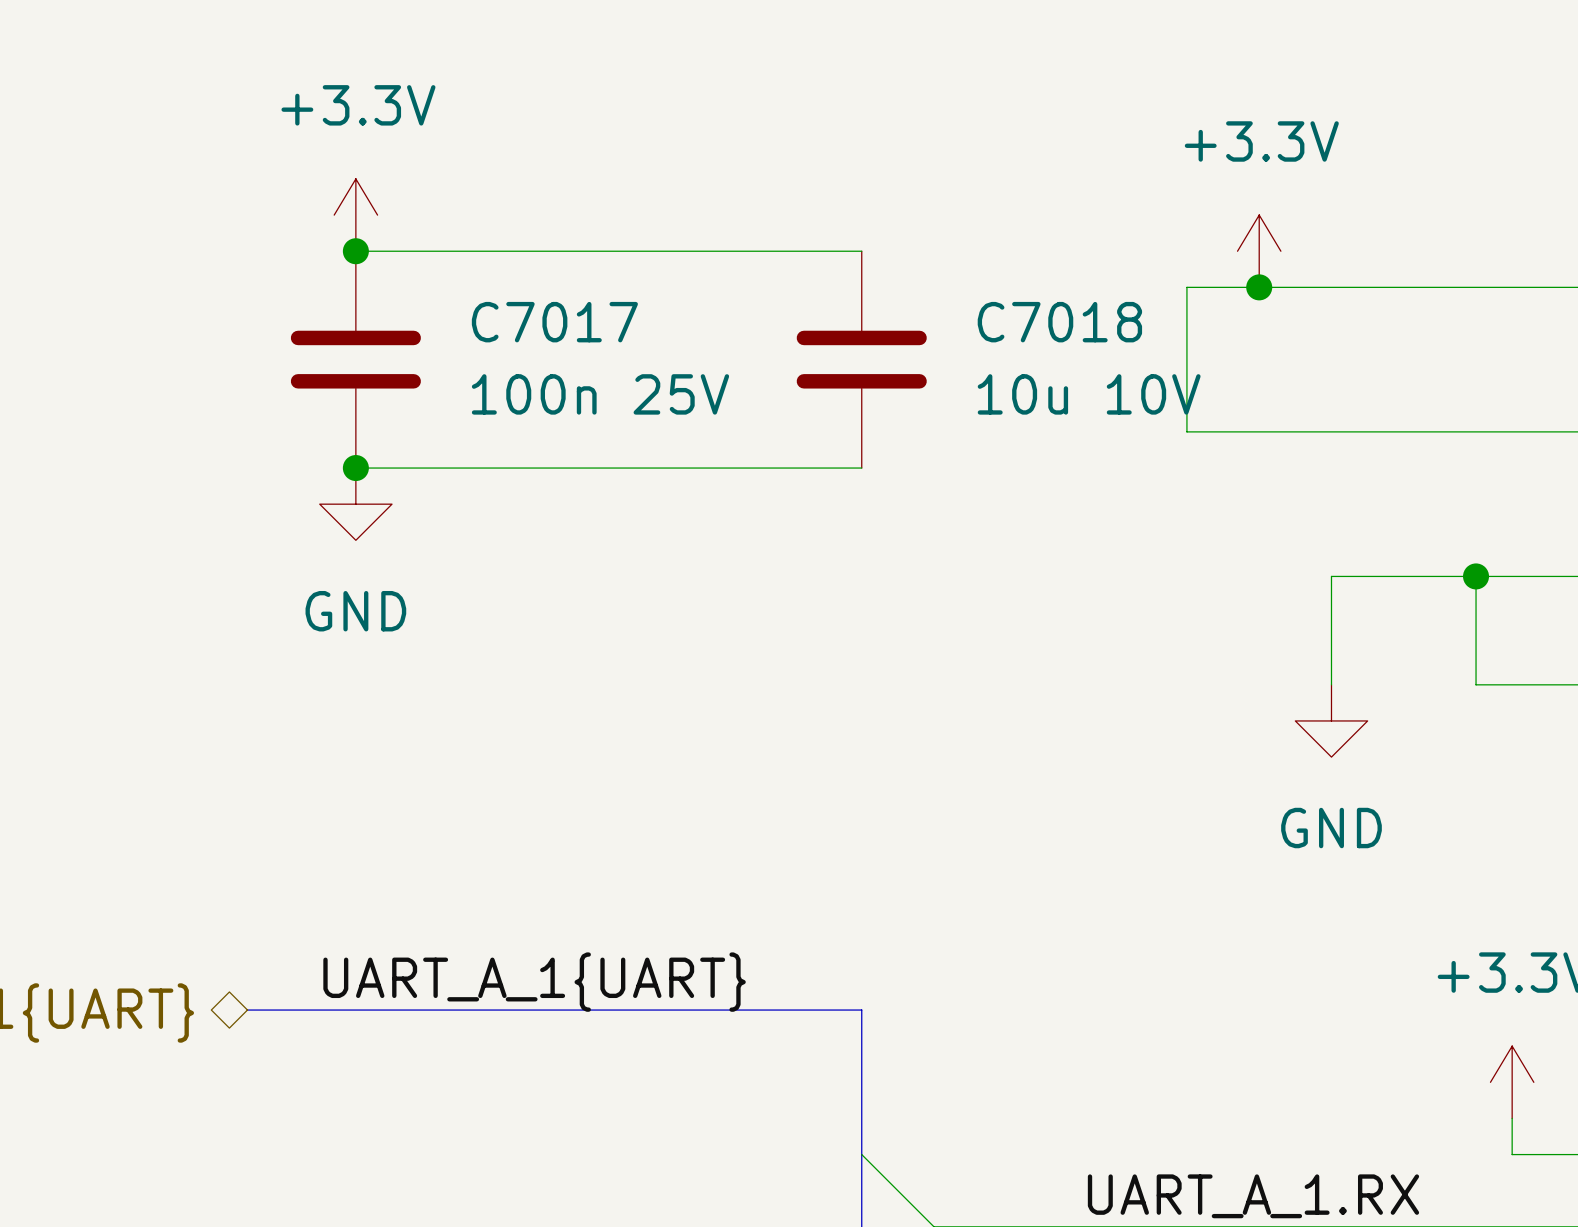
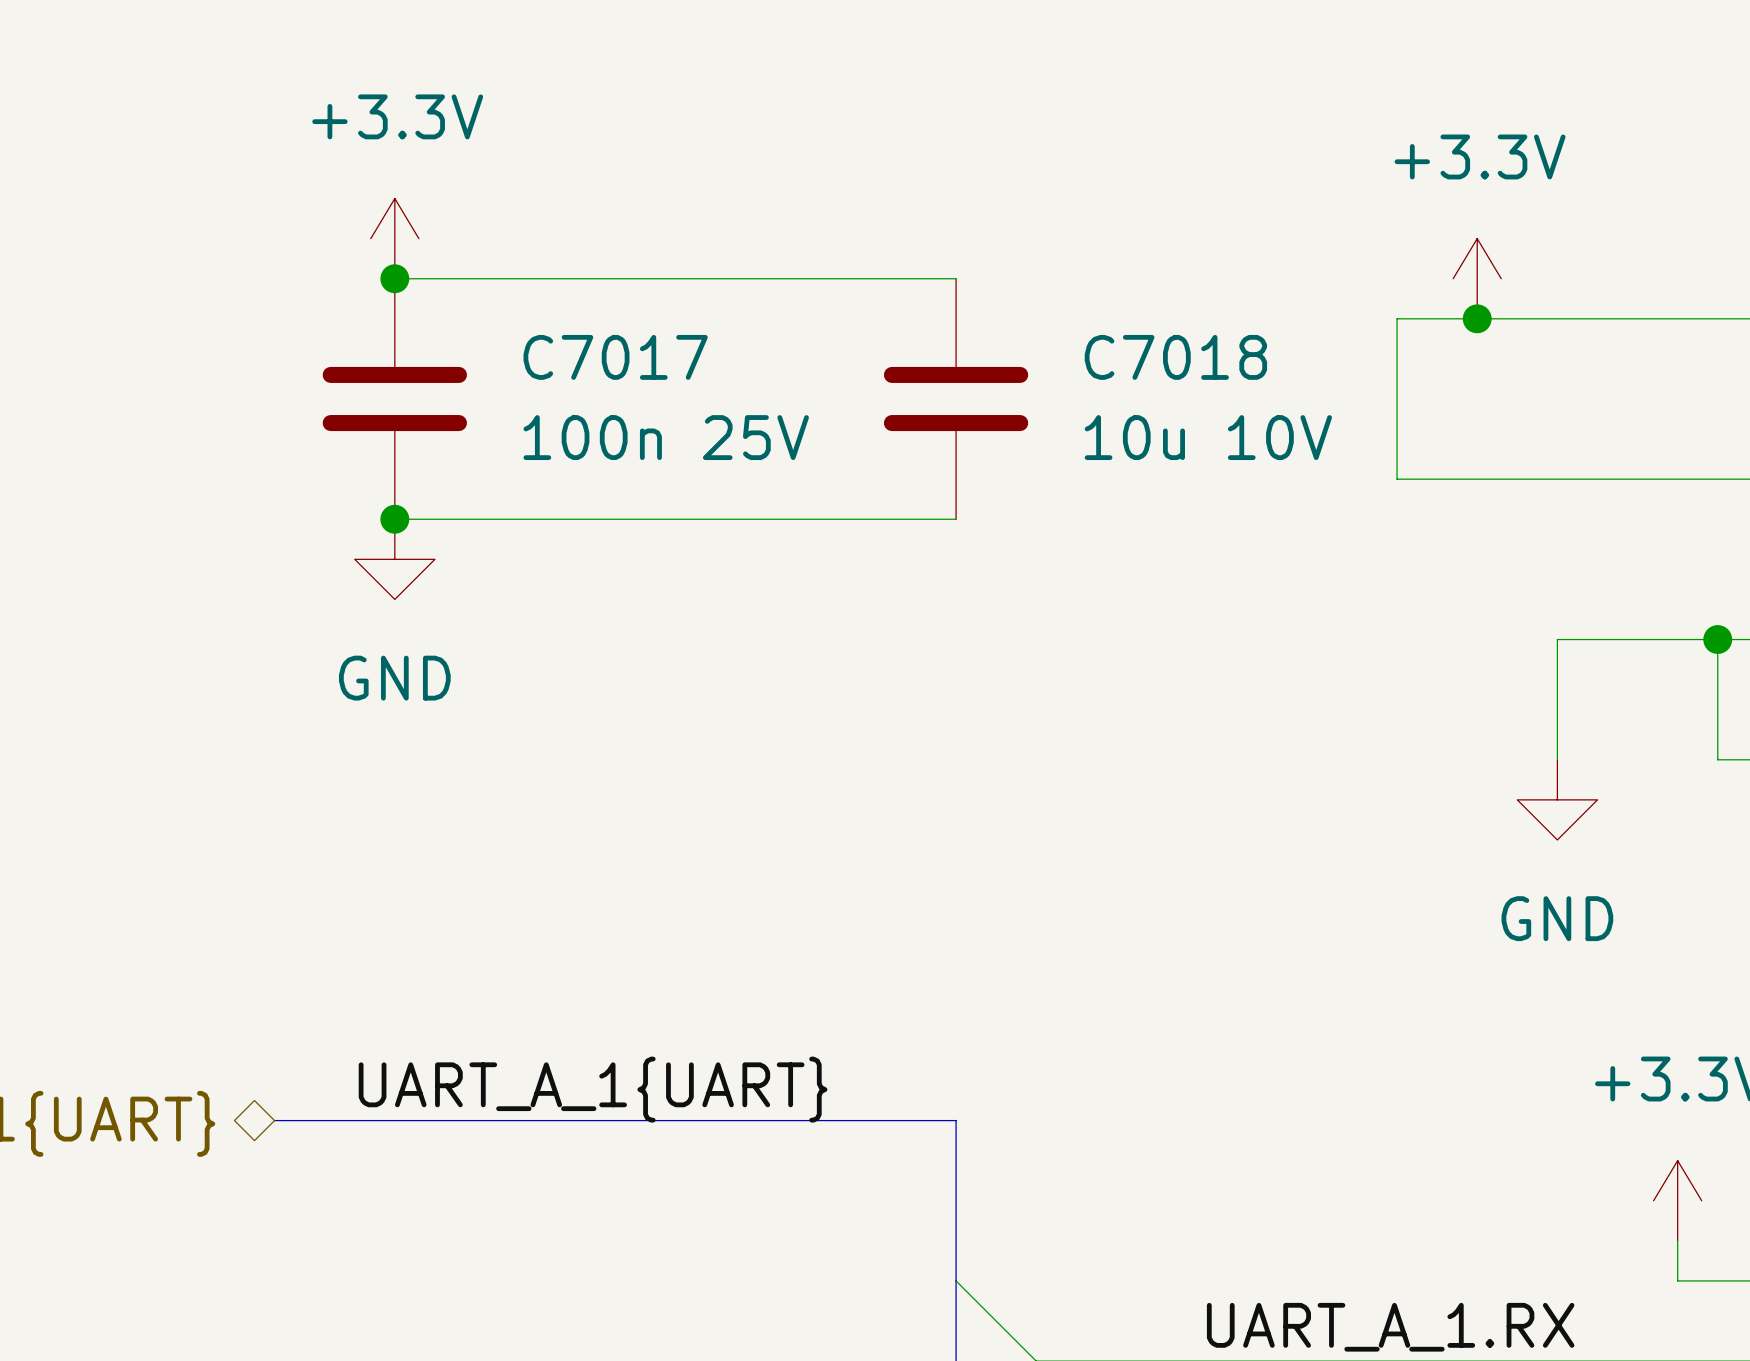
power symbol position: +3.3V (1259, 251) -> +3.3V (1477, 278)
wire: (1259, 287) (1186, 287) (1186, 431) (1259, 431) -> (1397, 318) (1397, 479)
junction position: (1259, 287) -> (1477, 318)
wire: (1403, 576) (1331, 576) (1331, 684) -> (1557, 639) (1557, 759)
wire: (1476, 576) (1476, 684) (1548, 684) -> (1717, 639) (1717, 759)
junction position: (1476, 576) -> (1717, 639)
power symbol position: GND (1331, 720) -> GND (1557, 799)

